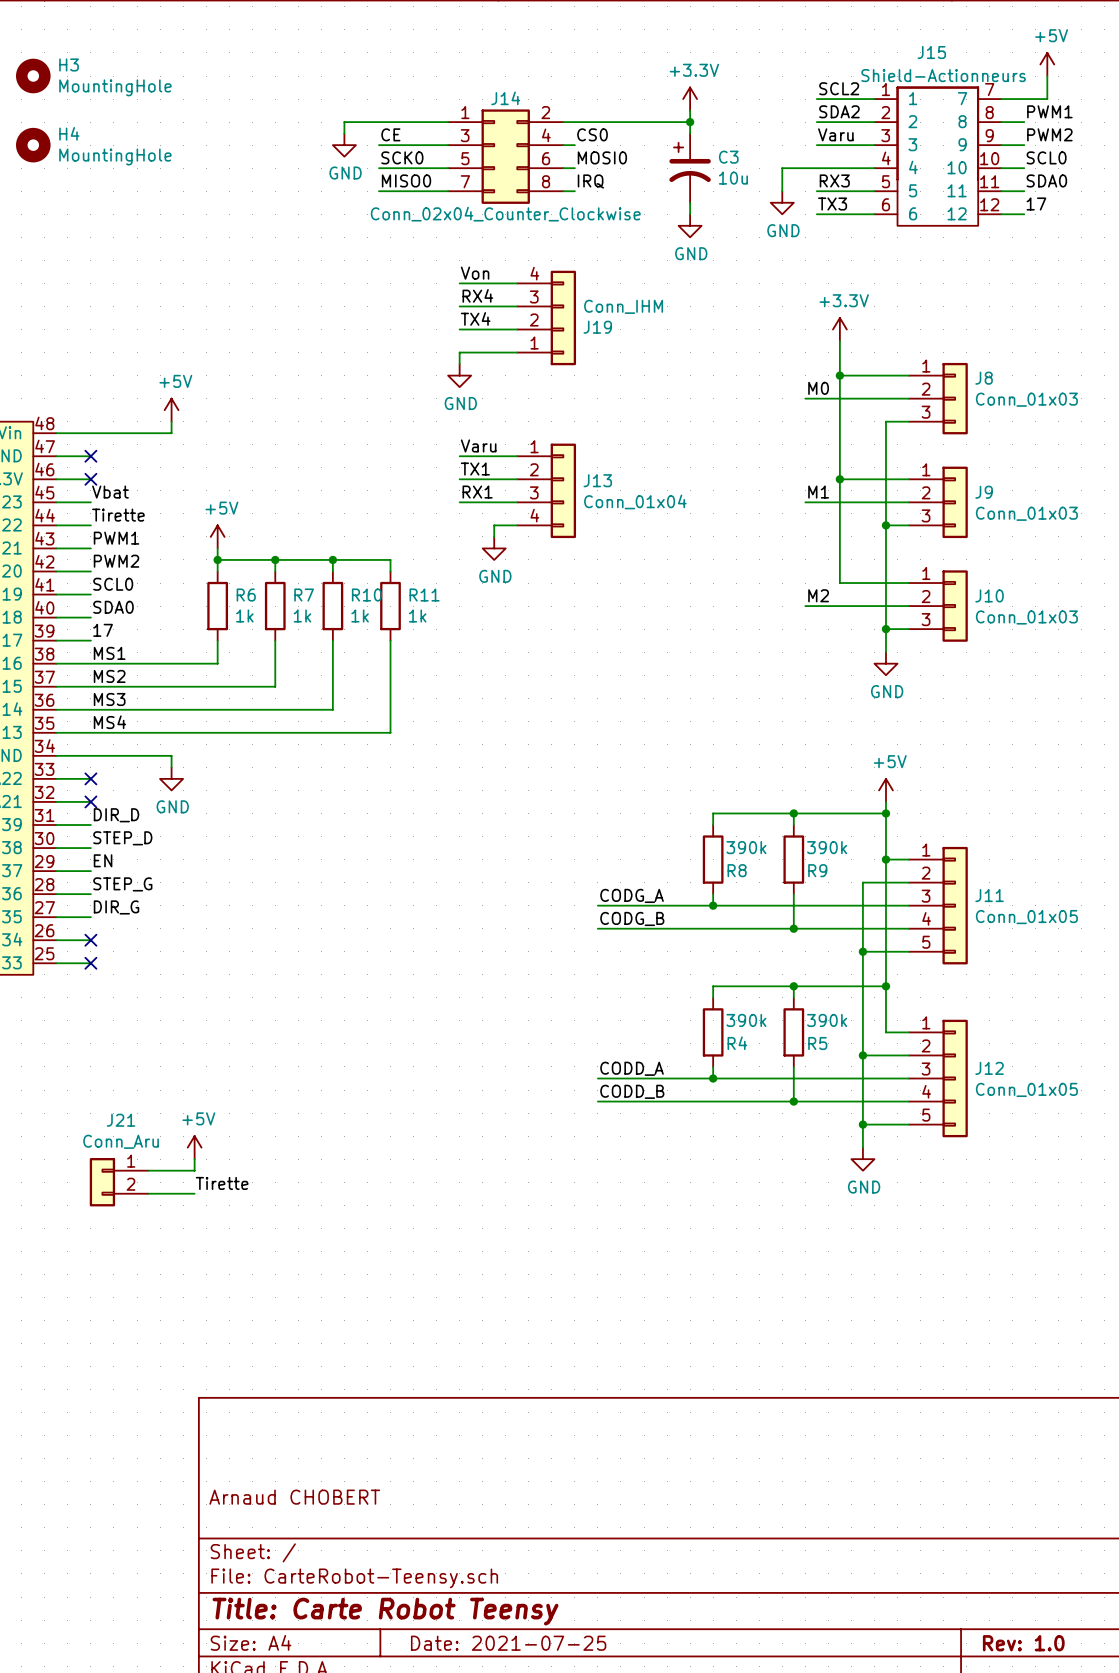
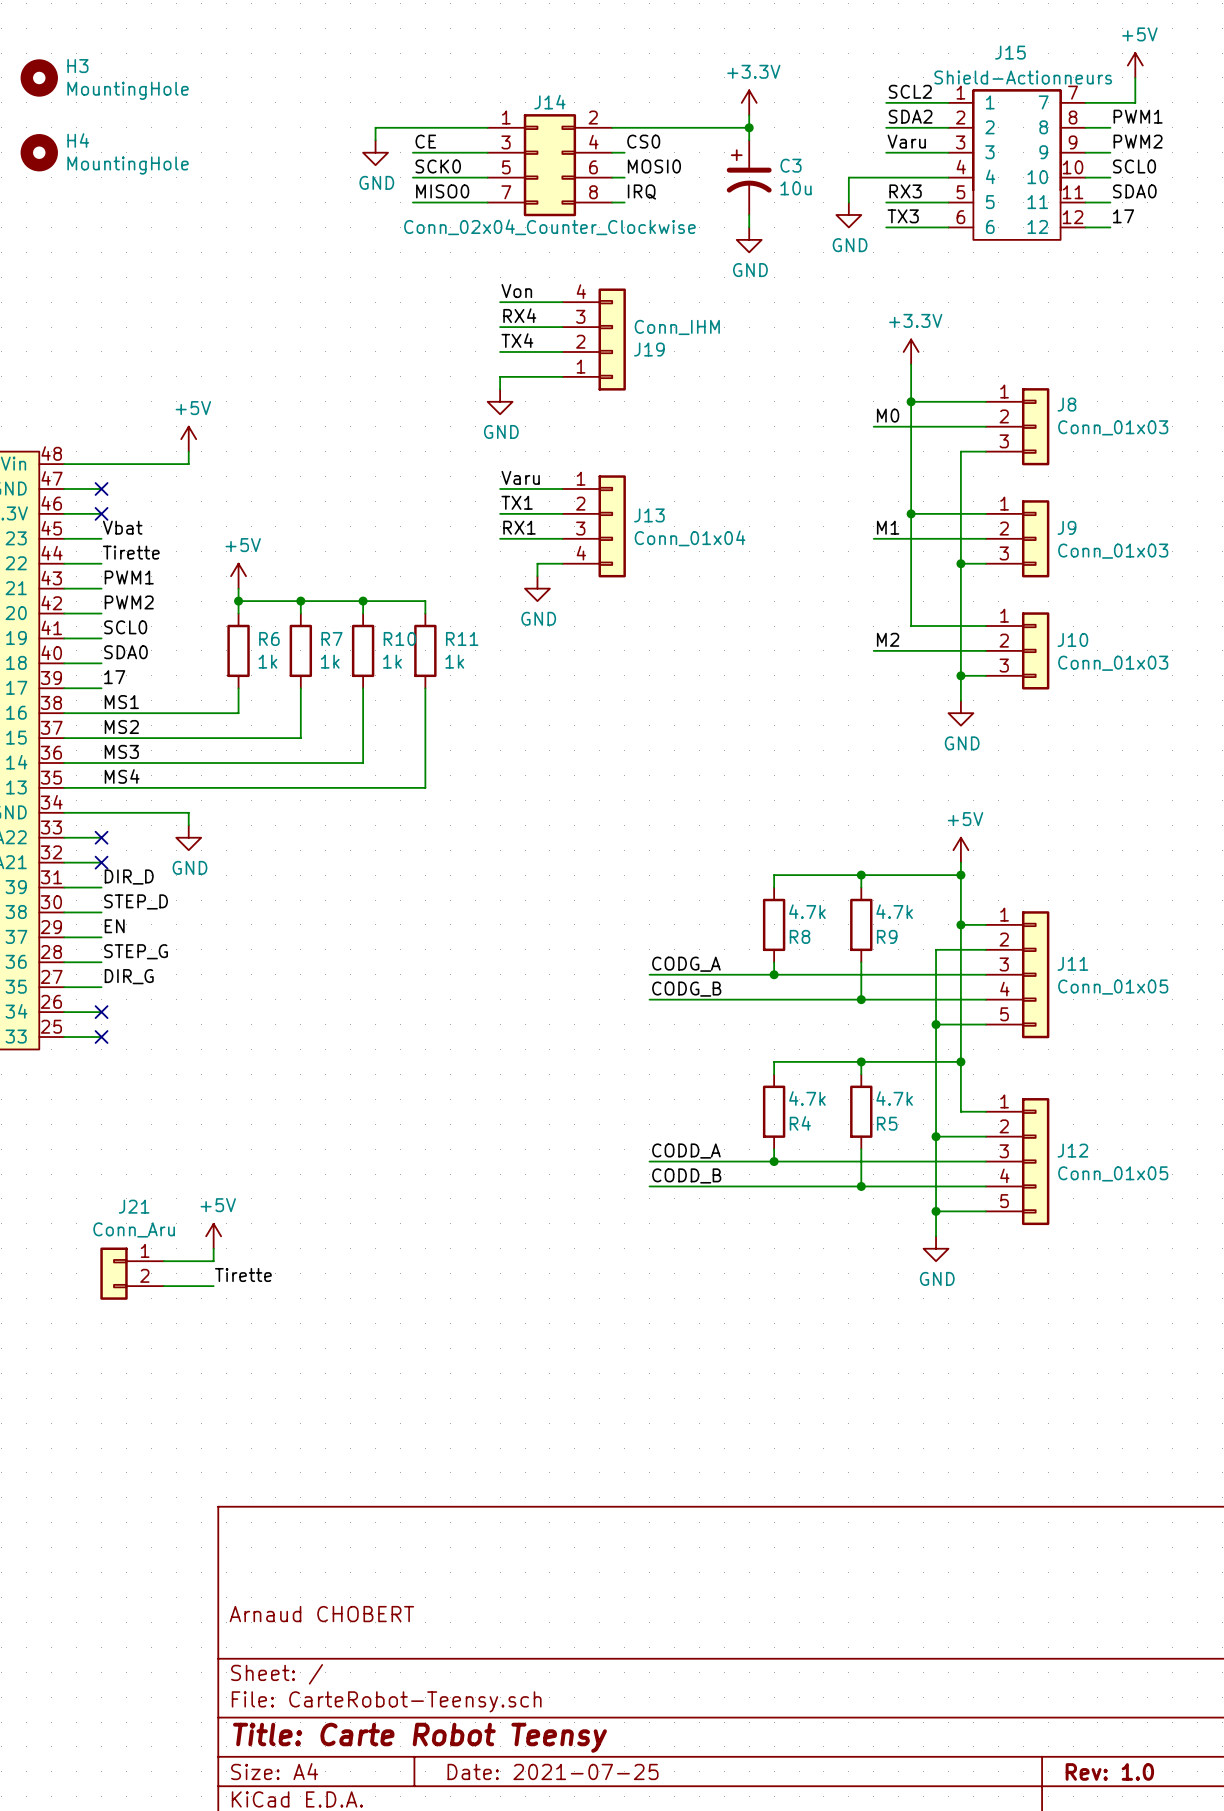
R8 value: 390k (746, 847) -> 4.7k (807, 911)
R9 value: 390k (827, 847) -> 4.7k (894, 911)
R4 value: 390k (746, 1020) -> 4.7k (807, 1098)
R5 value: 390k (827, 1020) -> 4.7k (894, 1098)

